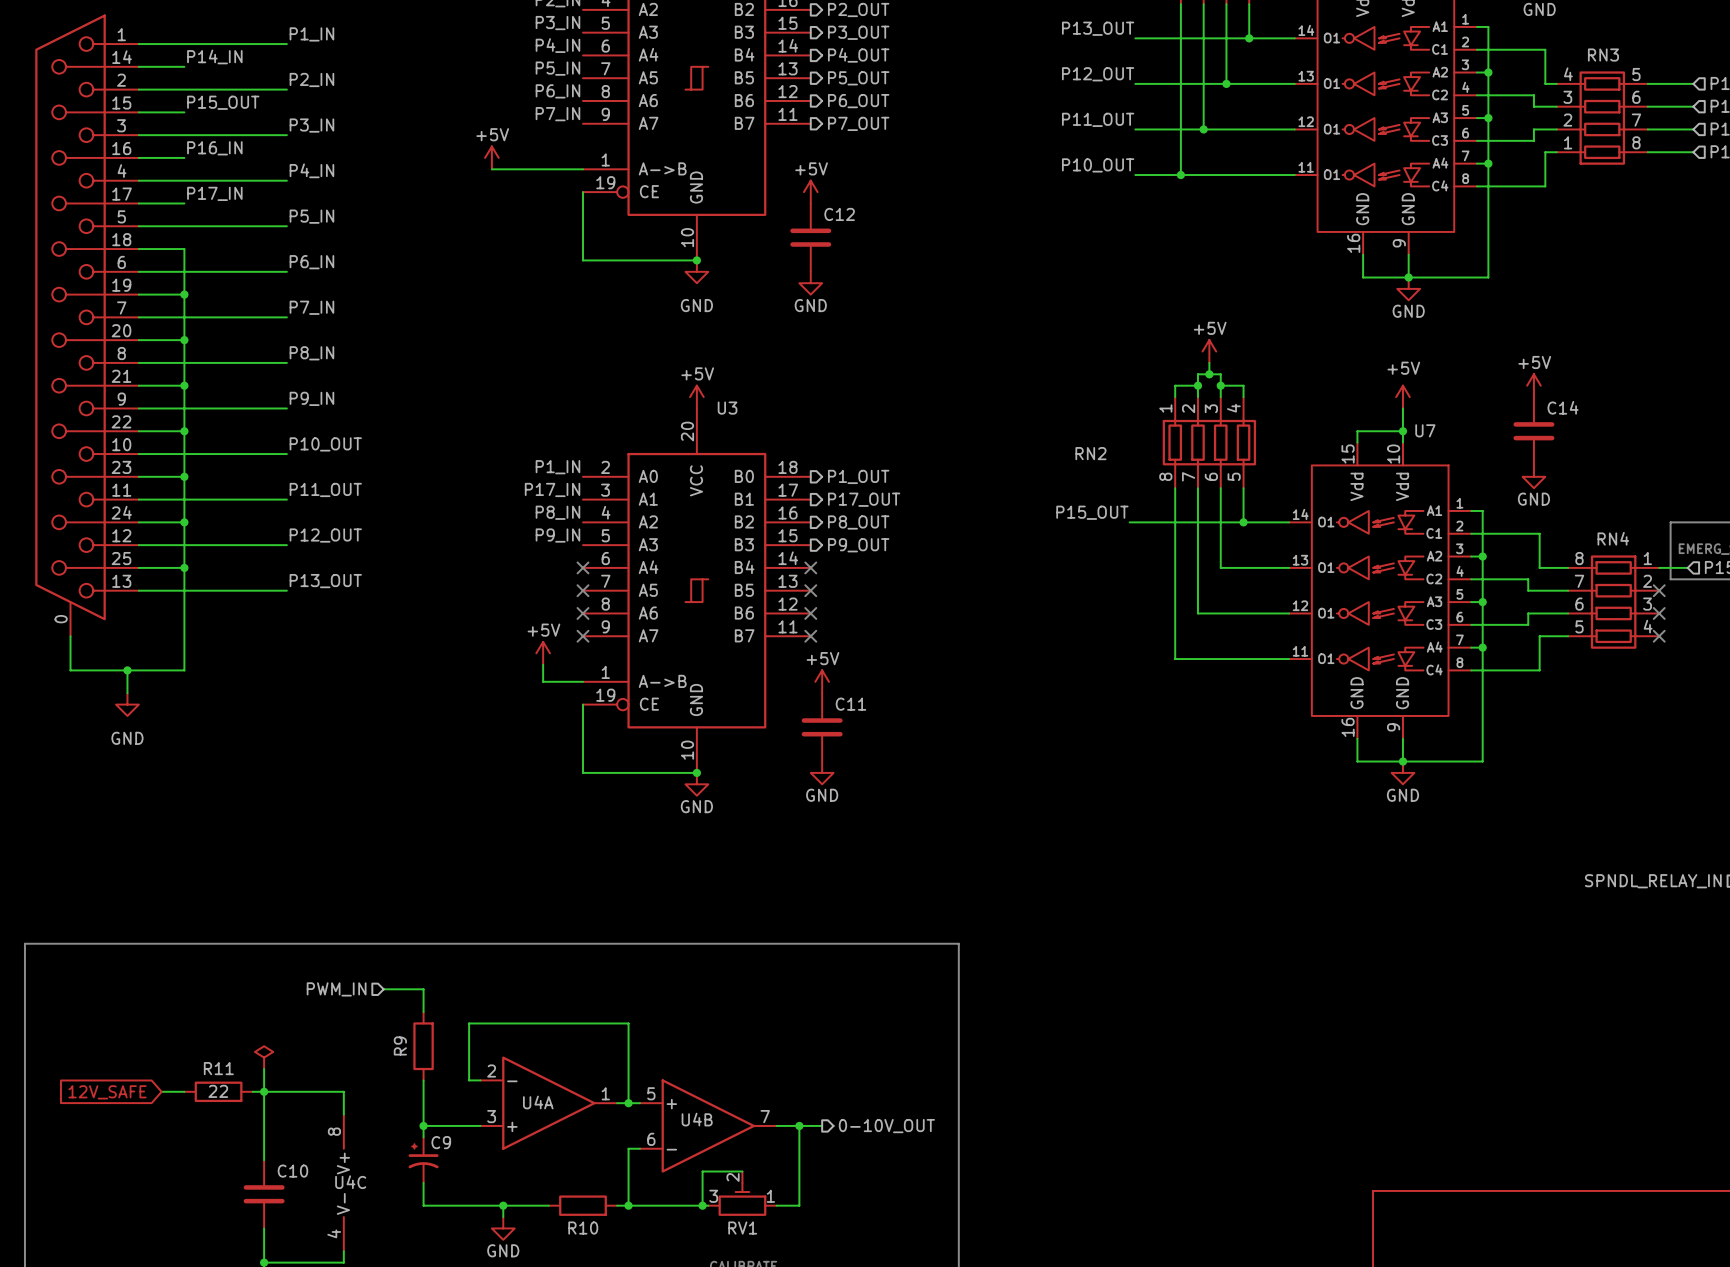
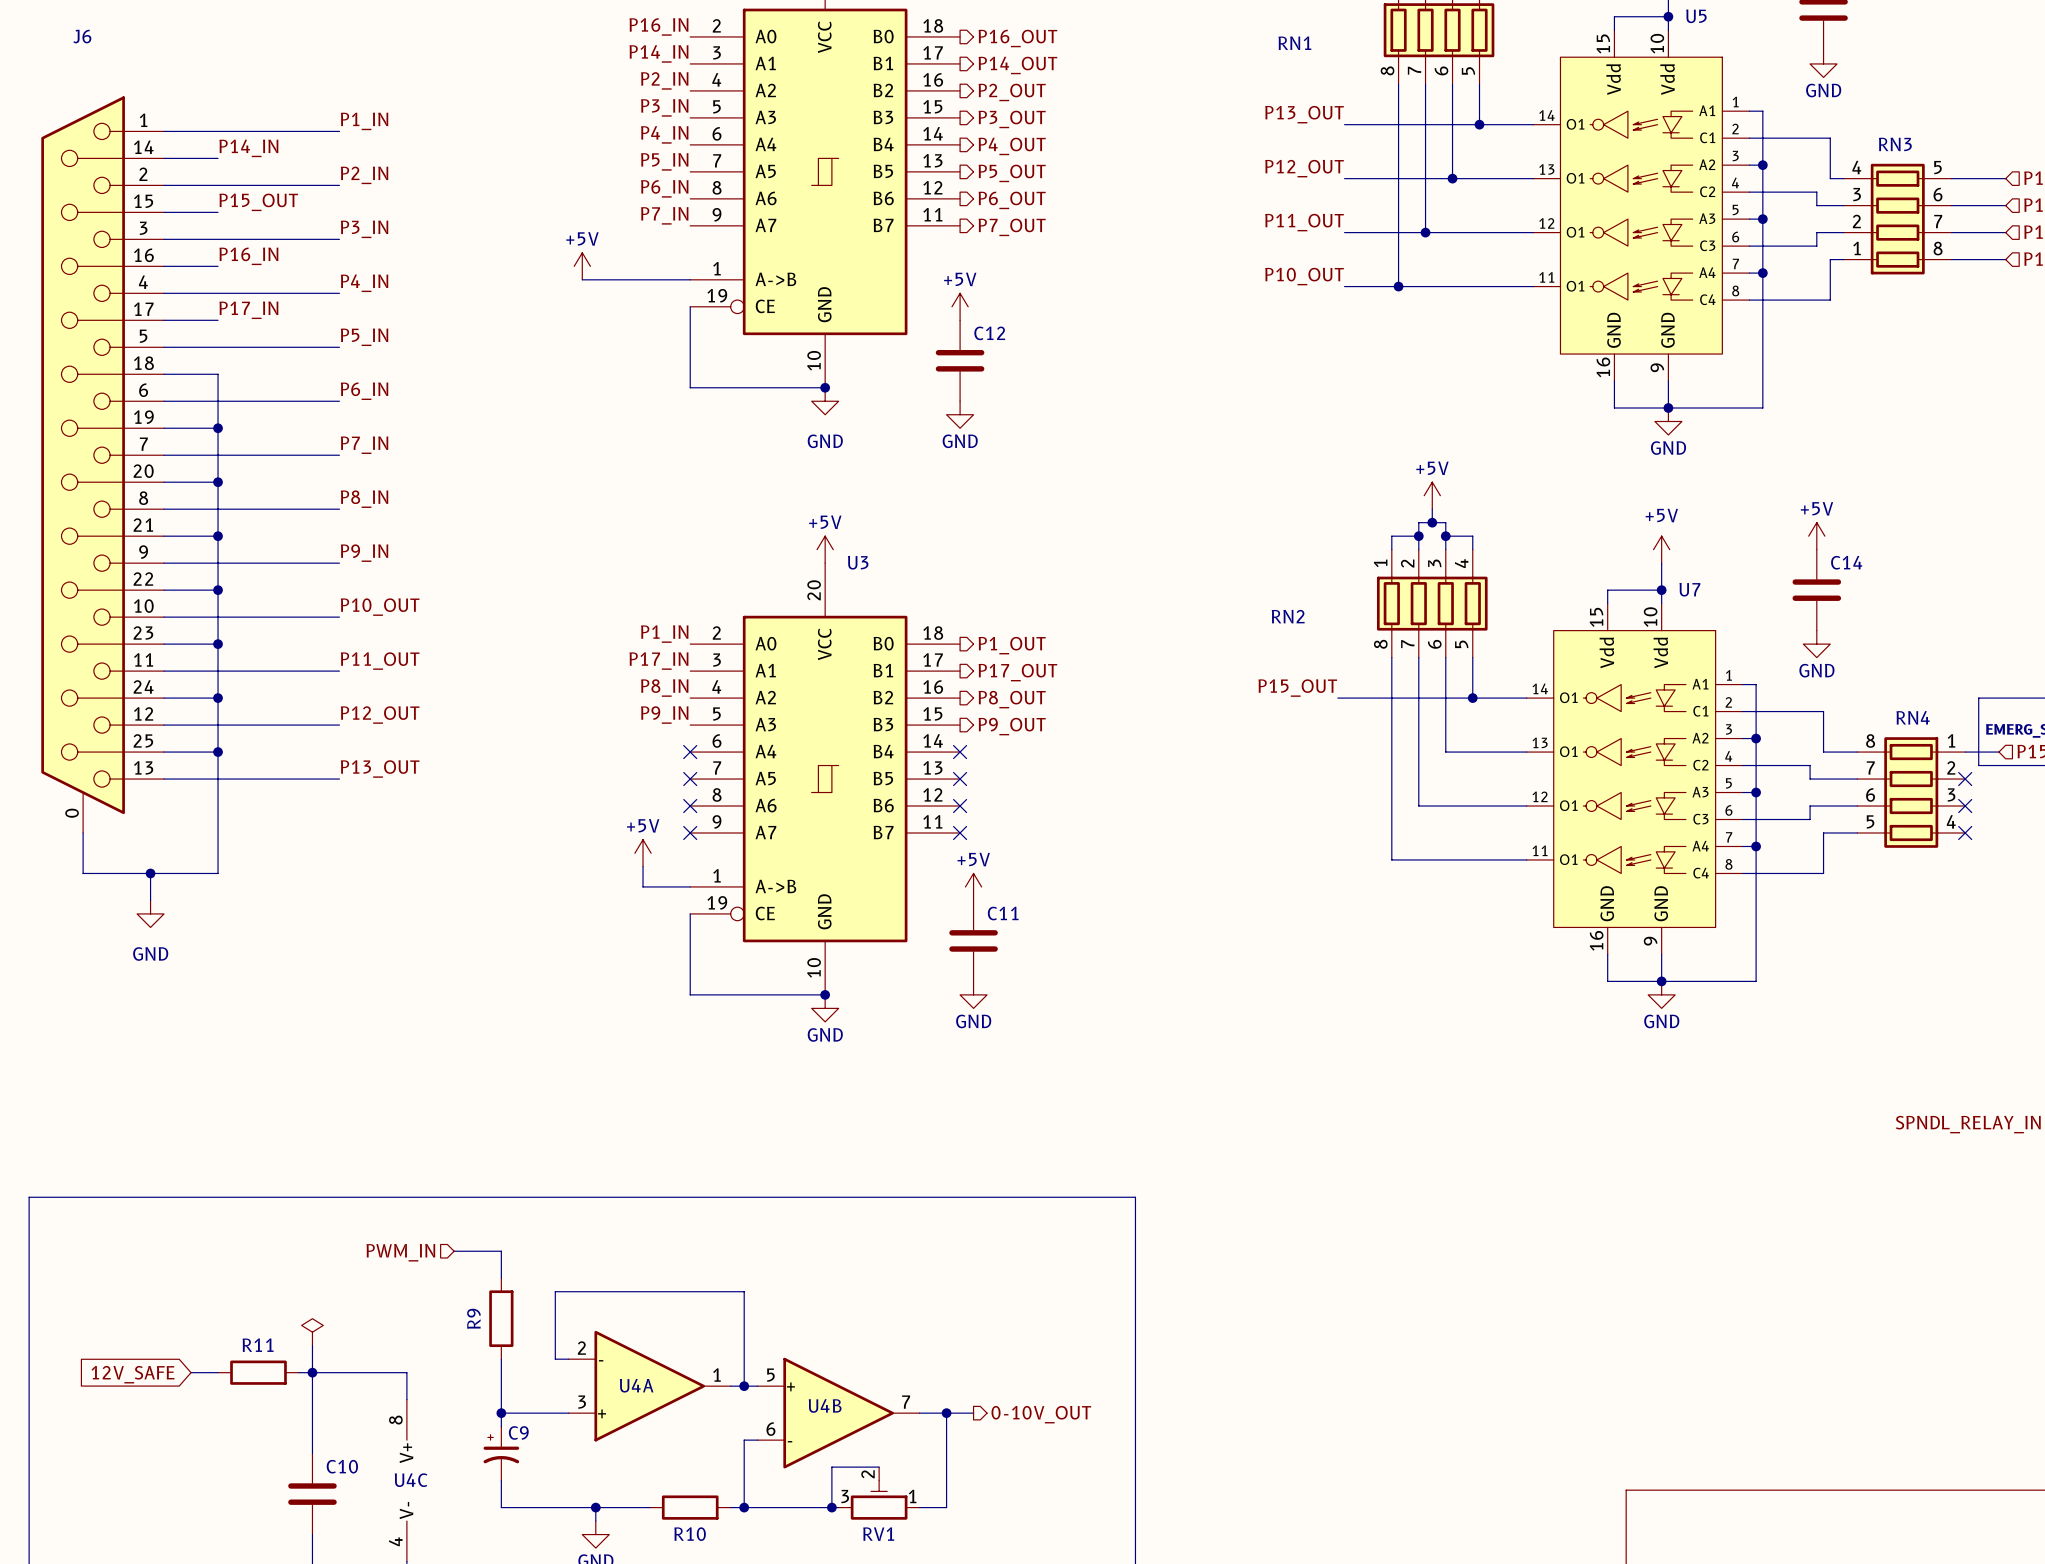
R11 value: 22 (218, 1091) -> none

